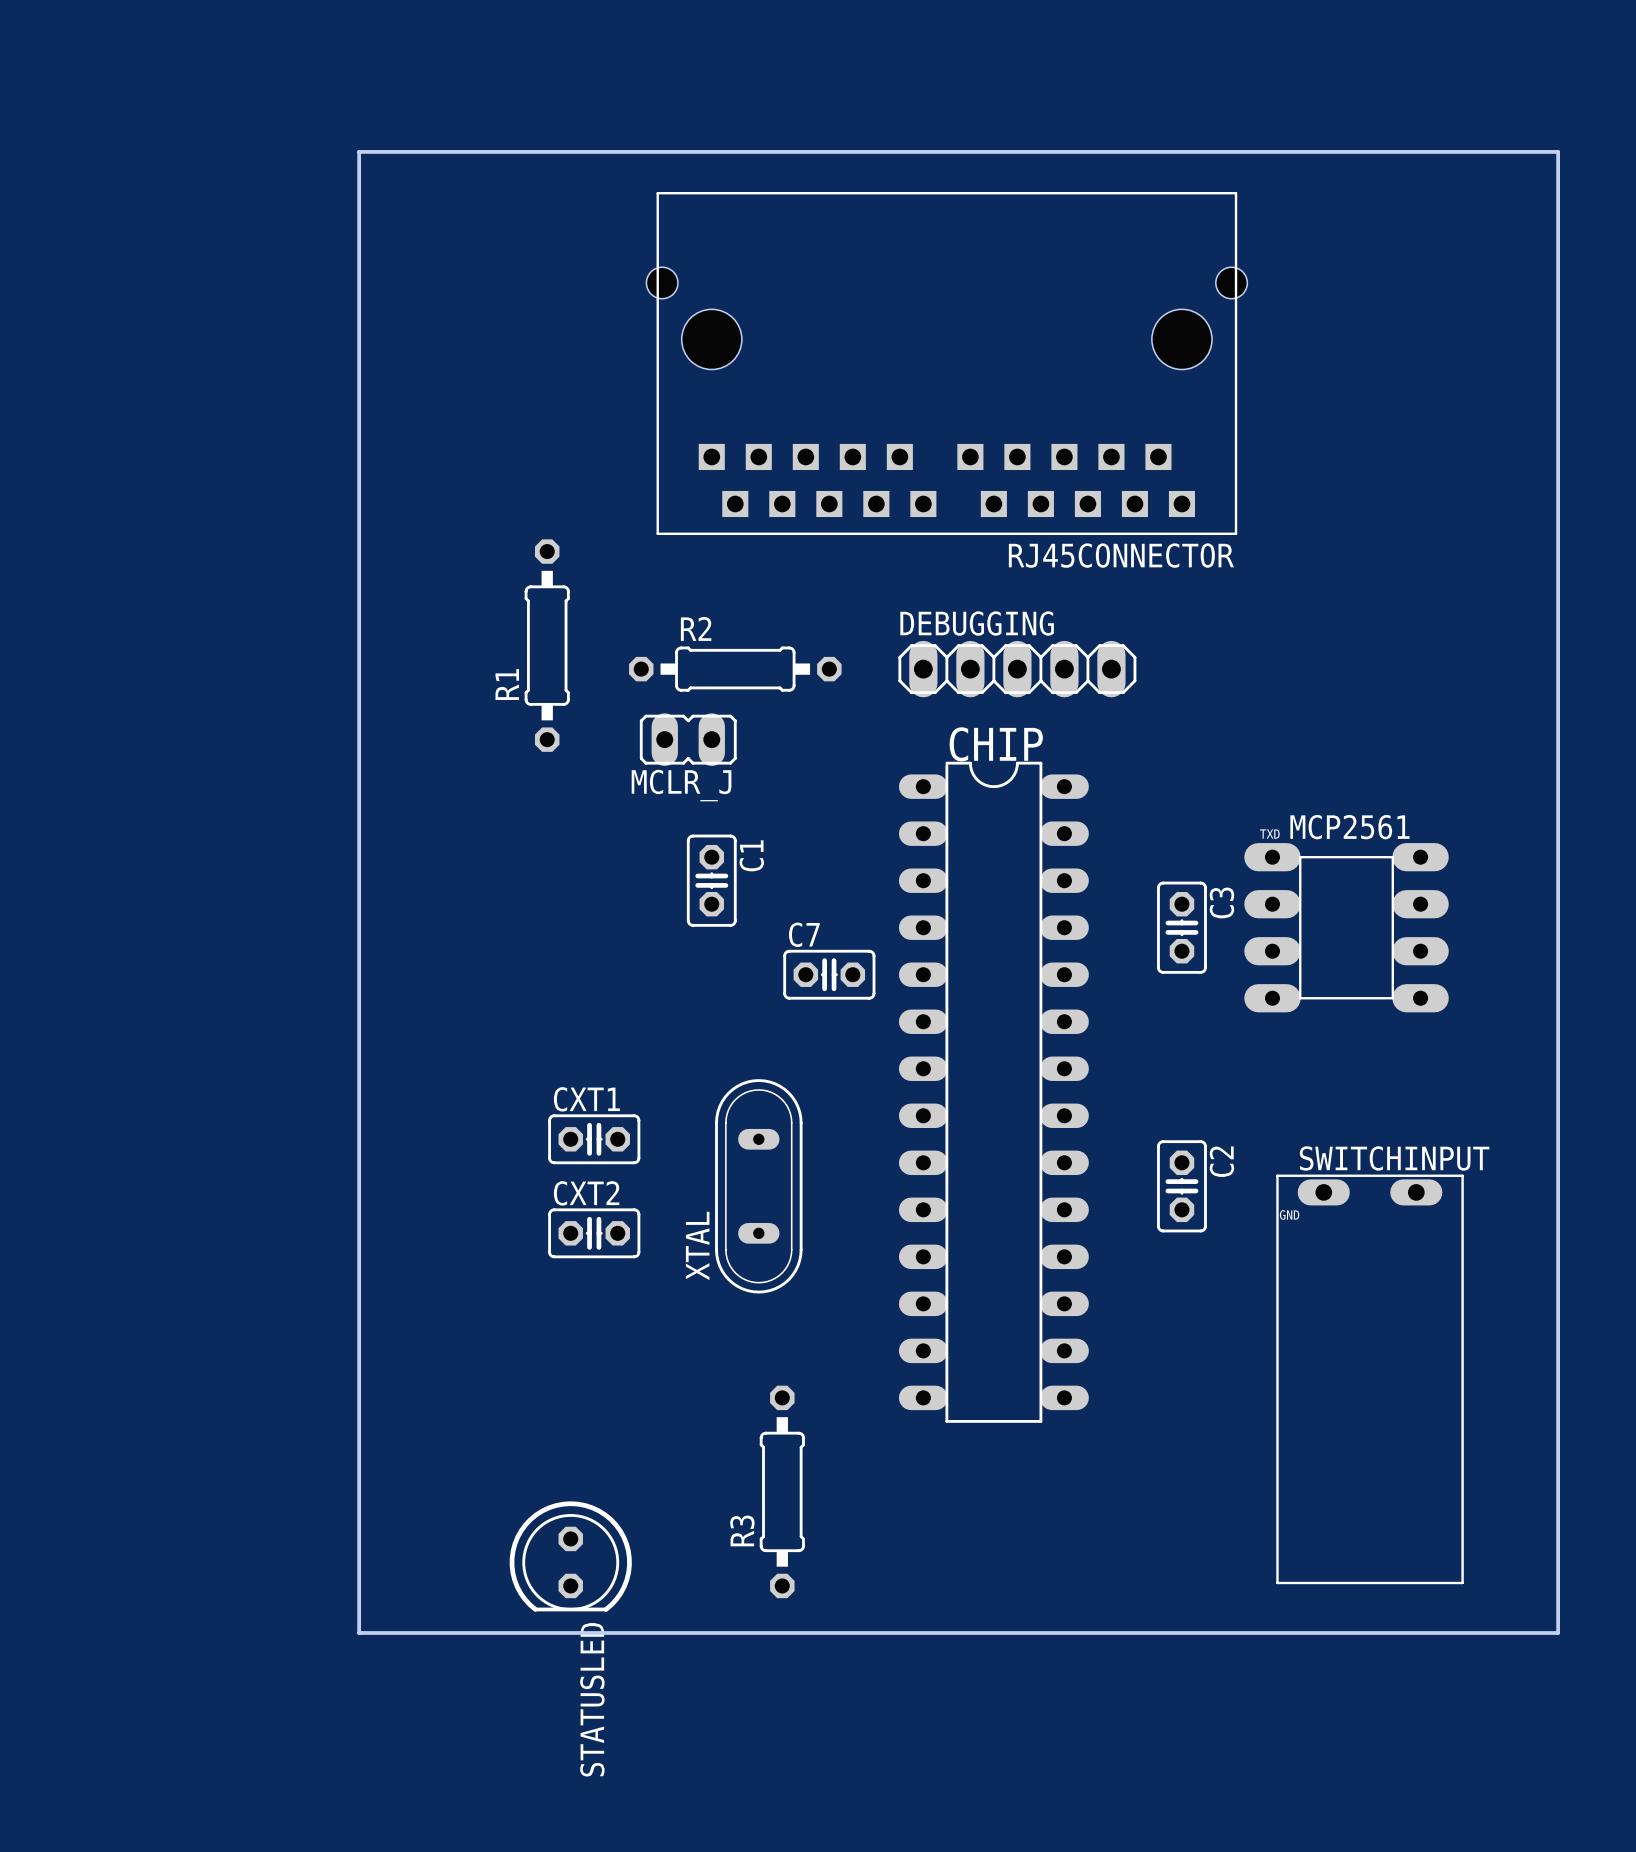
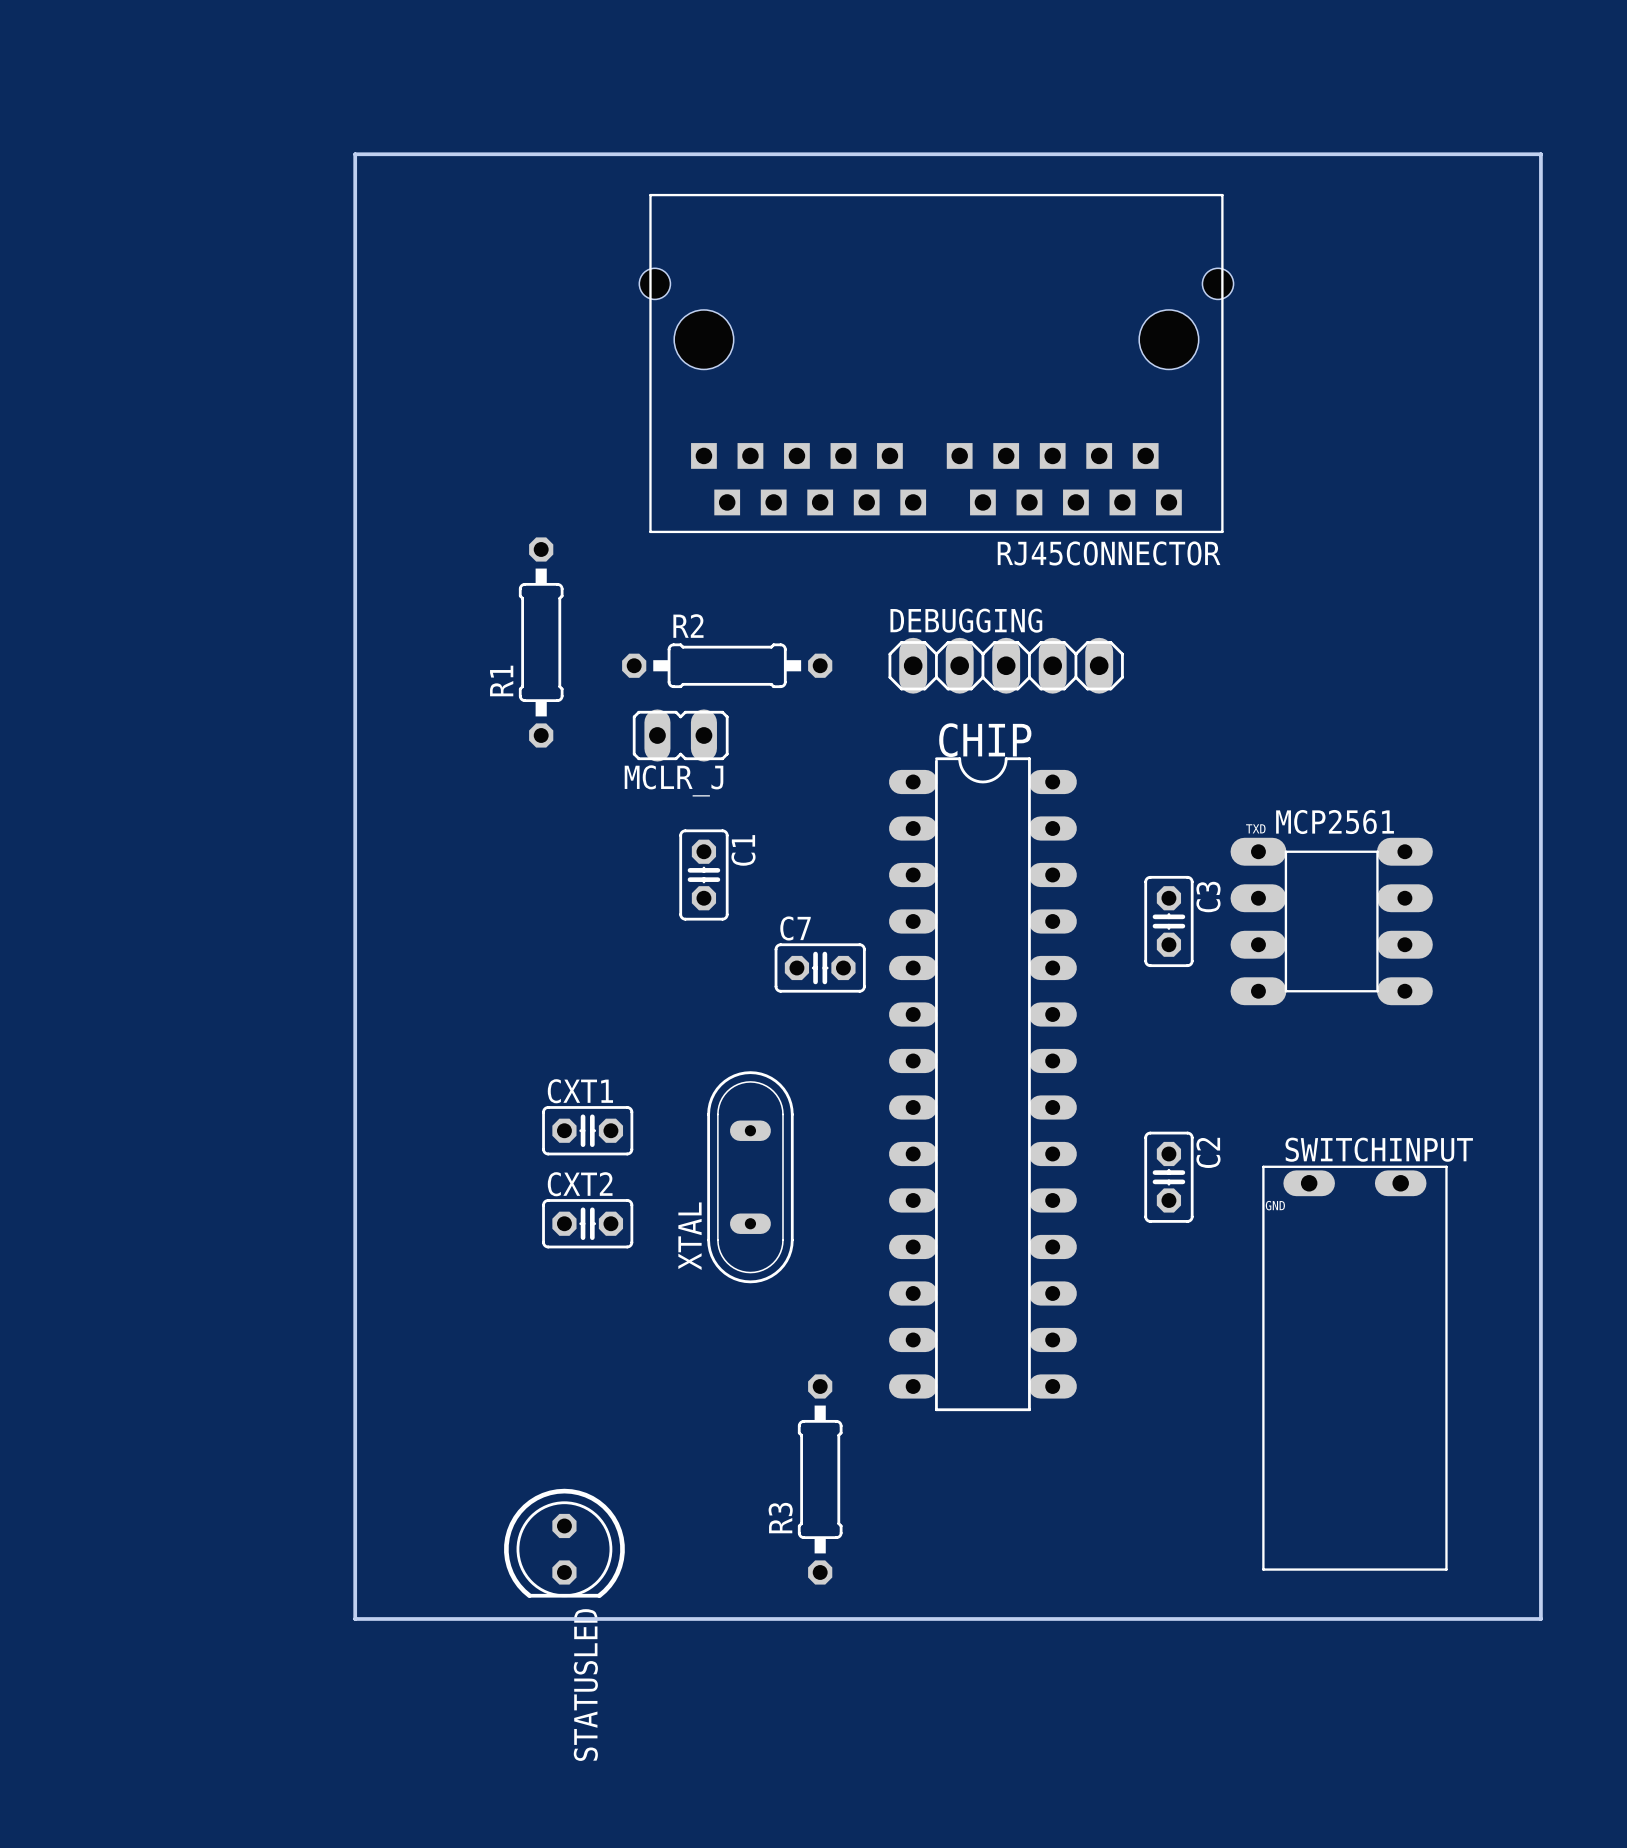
R3 position: (782, 1491) -> (820, 1479)

